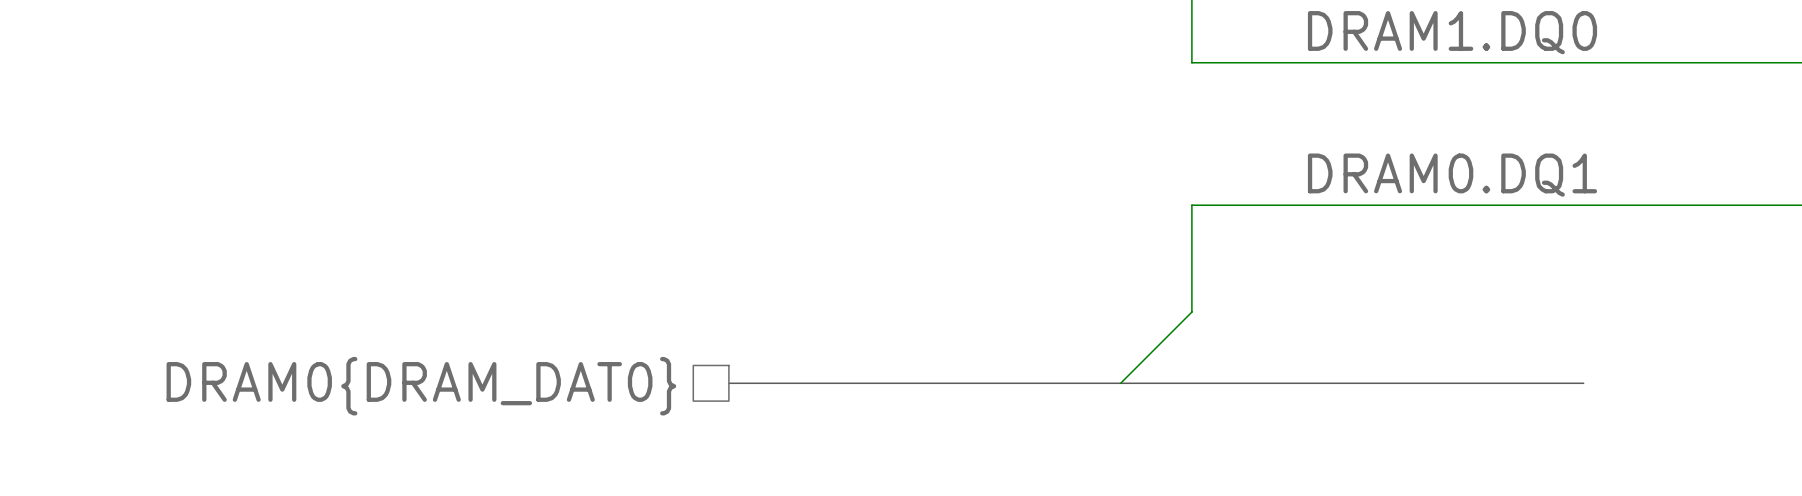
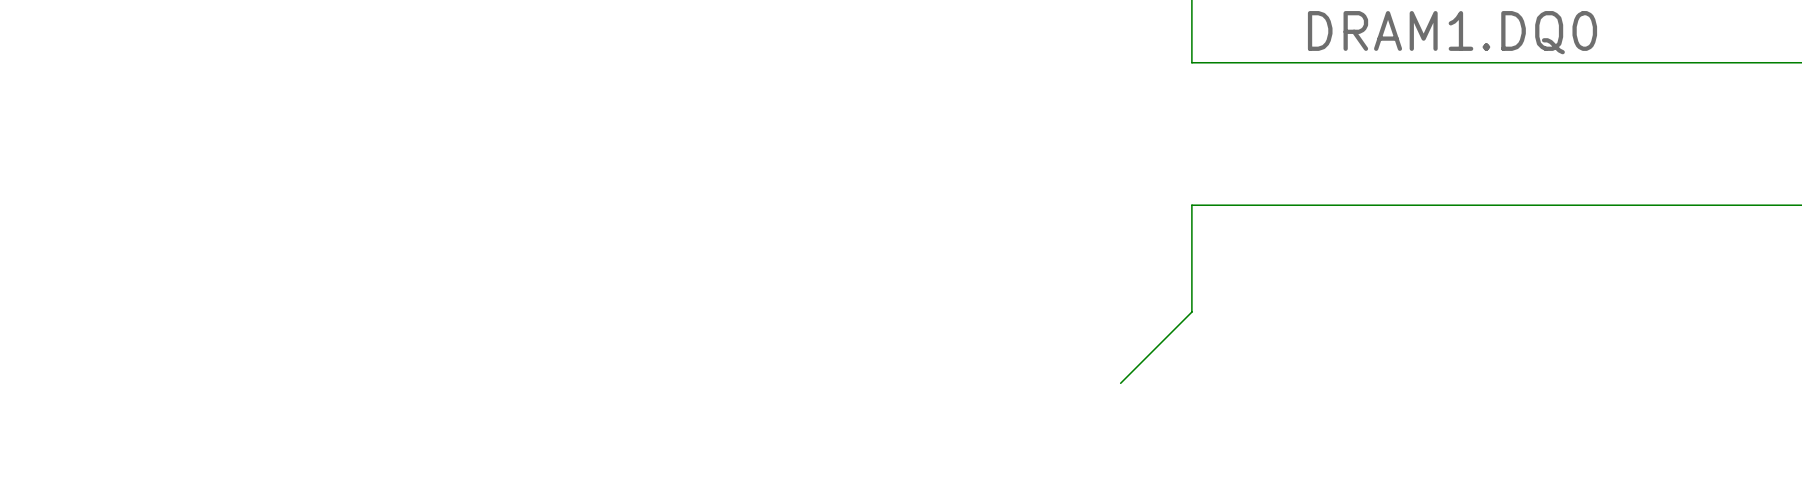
label: DRAM0.DQ1 (1452, 175) -> none
bus: (728, 383) (1583, 383) -> none
hierarchical label: DRAM0{DRAM_DAT0} (421, 386) -> none

